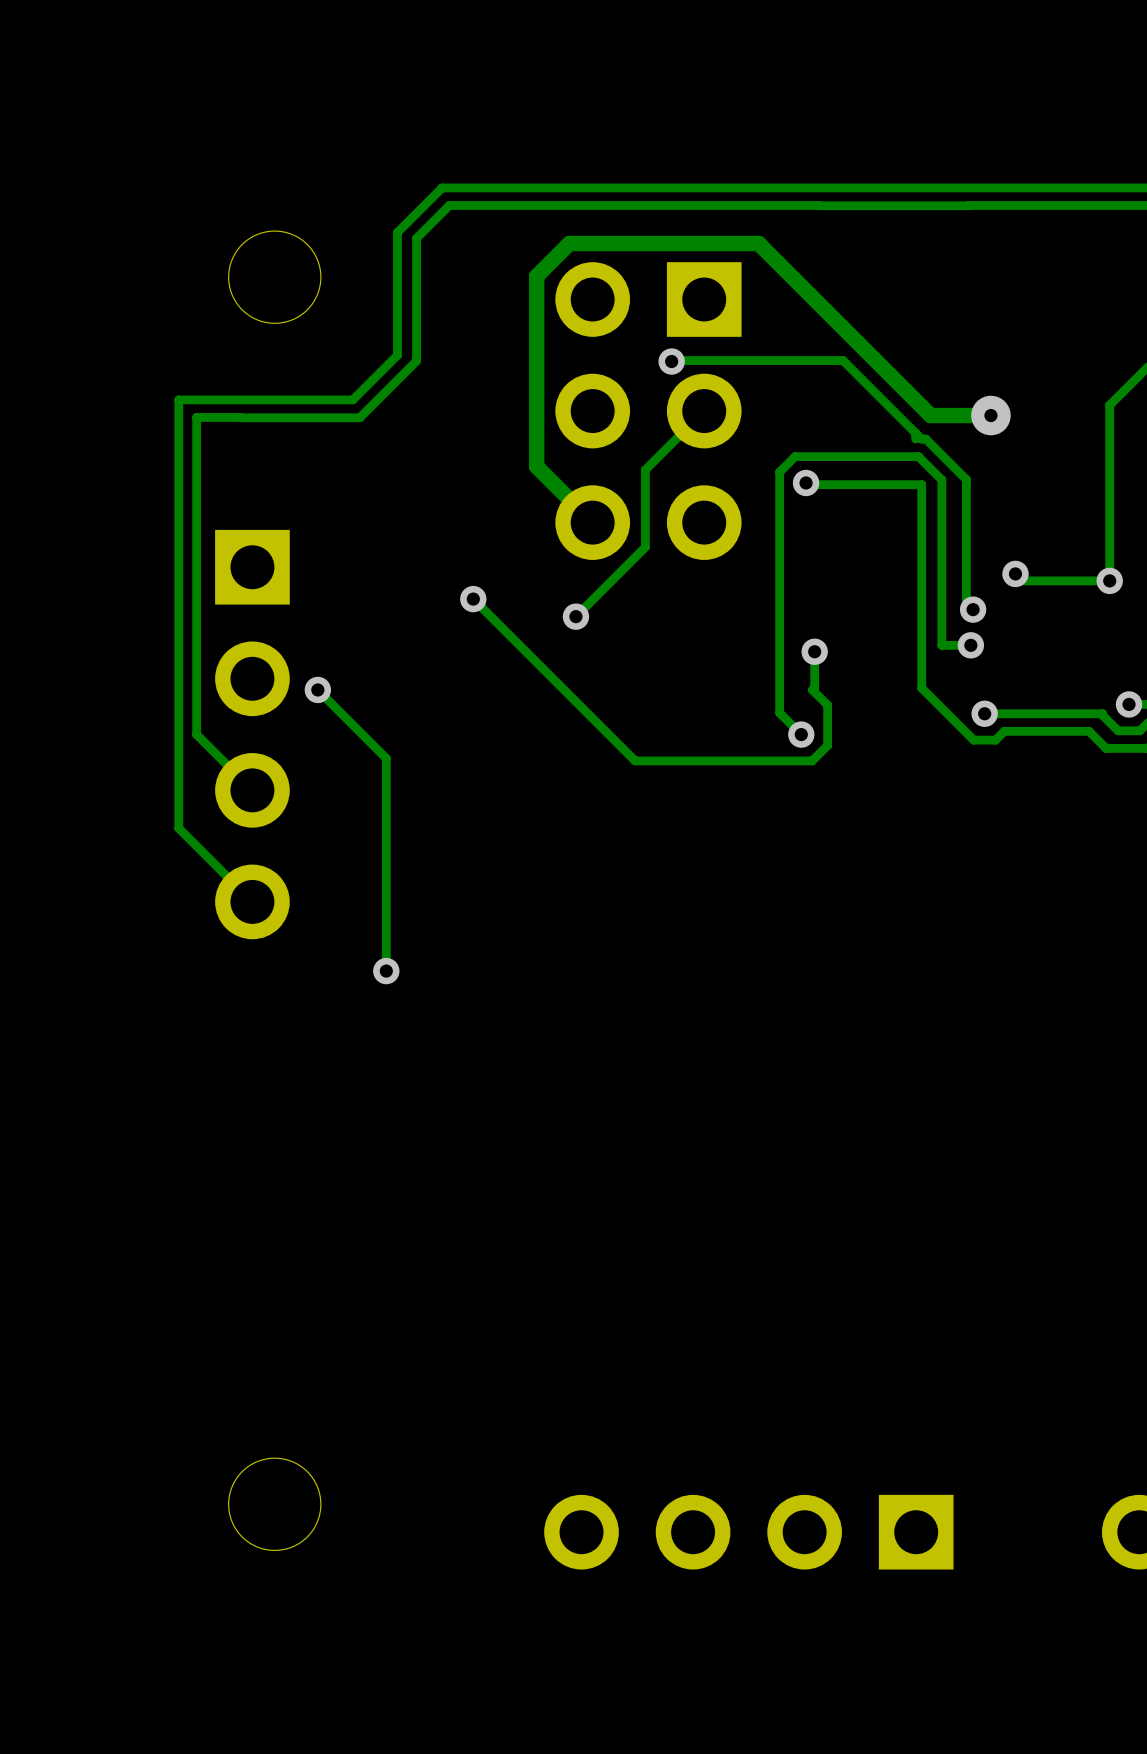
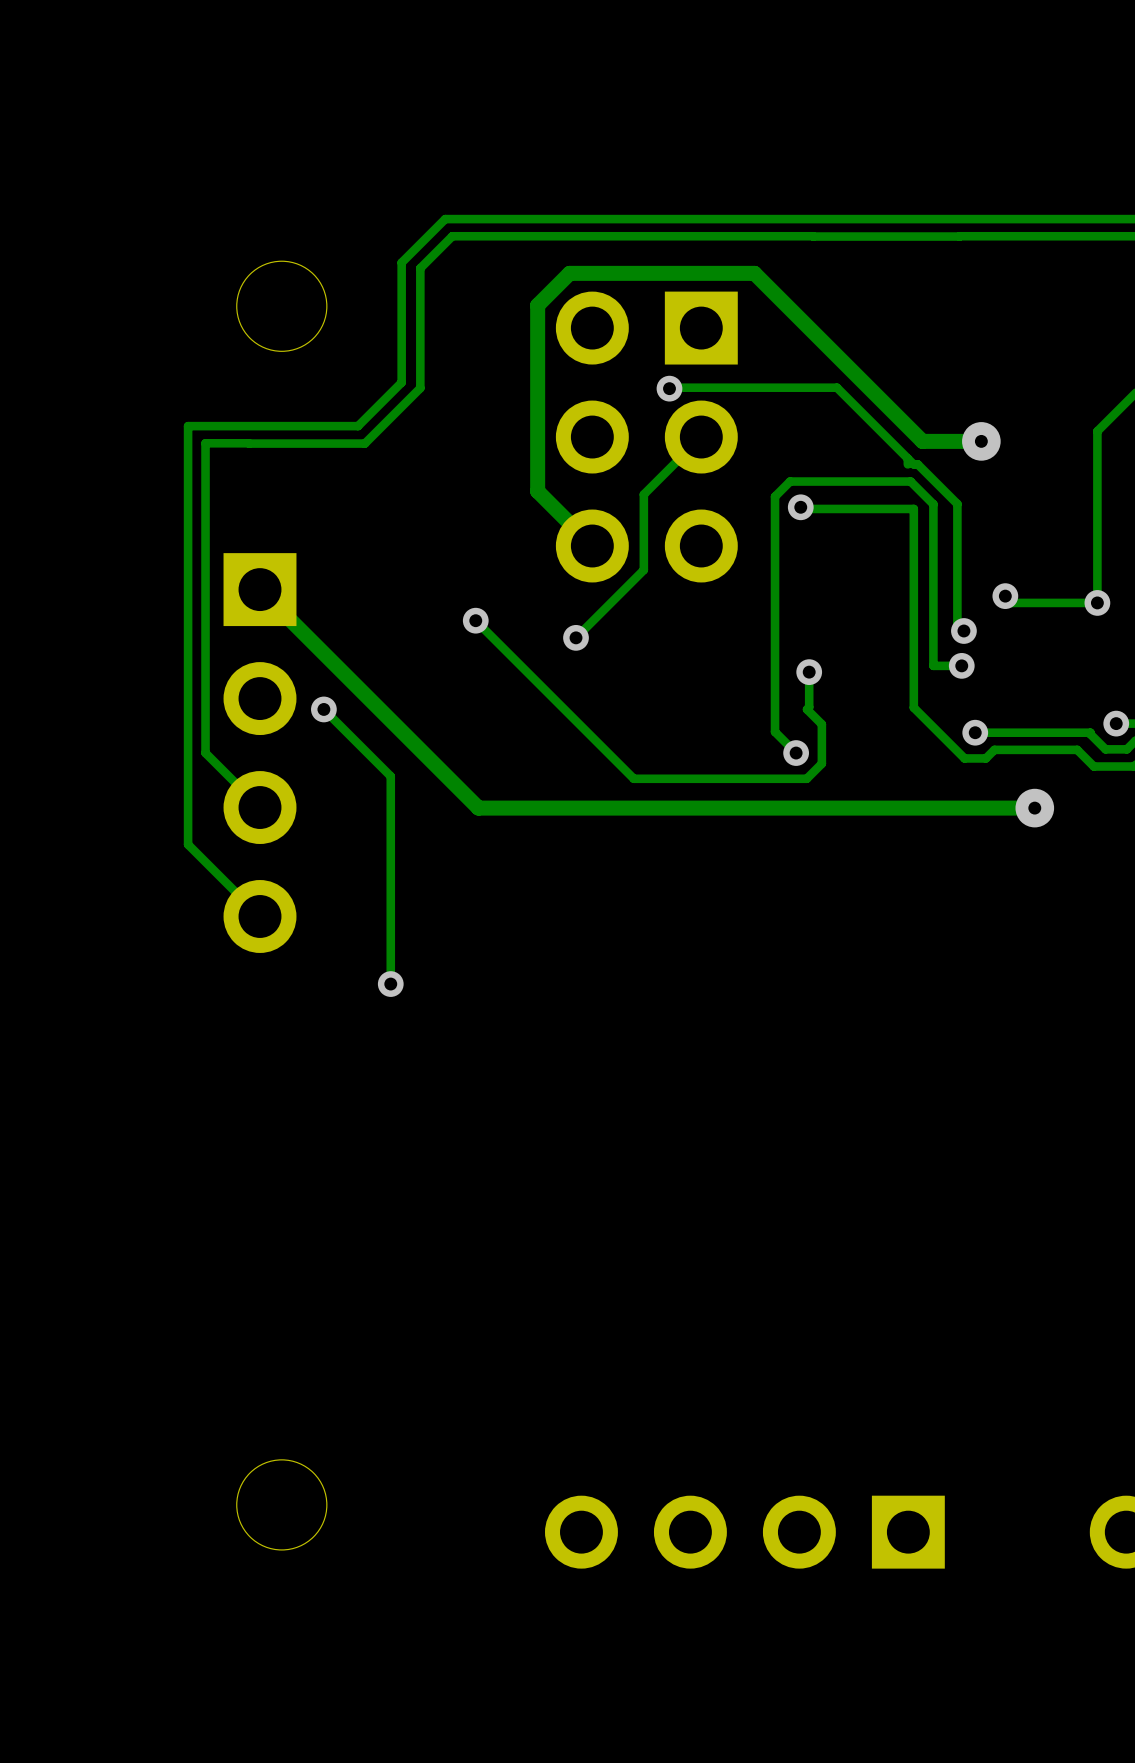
track: none -> (260, 589) (478, 808) (1034, 808)
via: none -> (1034, 808)

